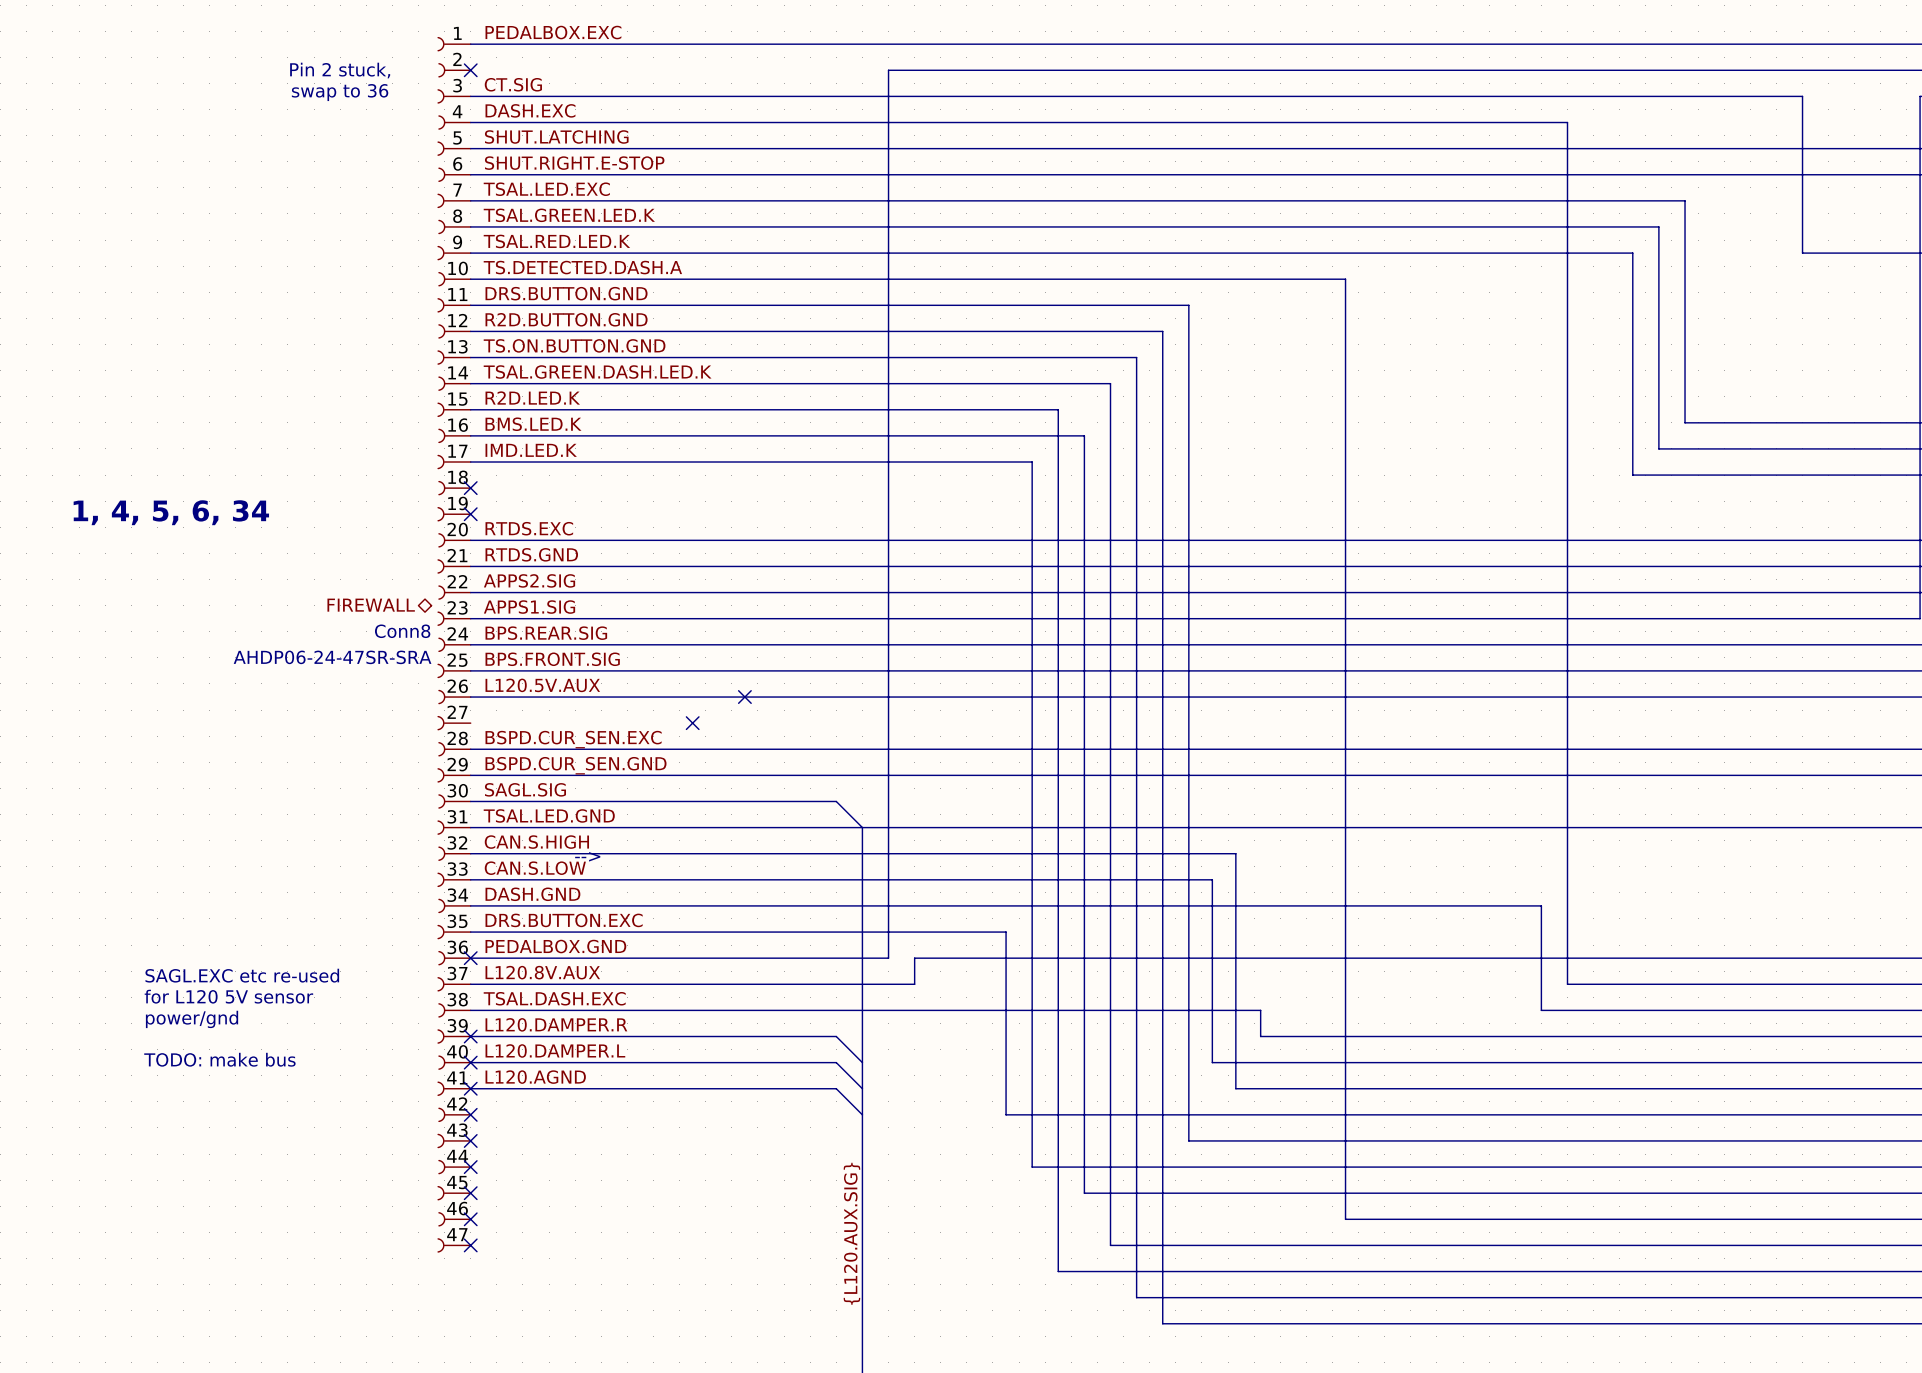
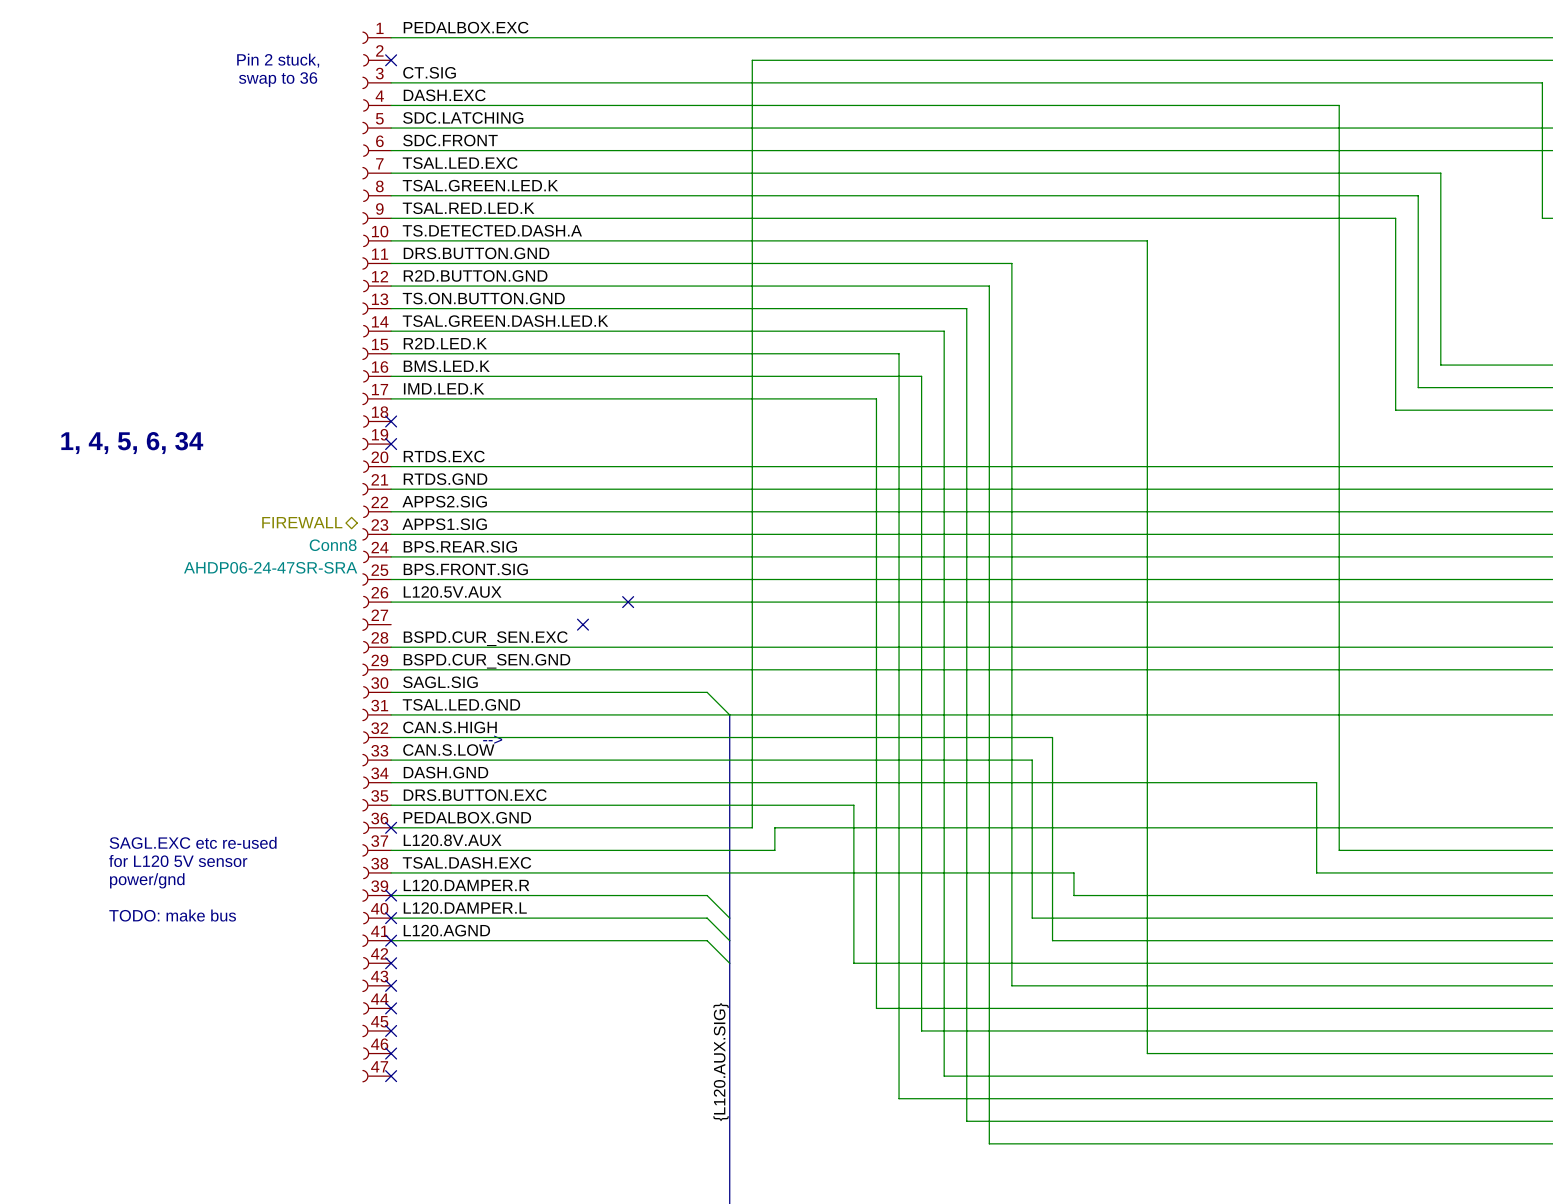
label: SHUT.LATCHING (556, 136) -> SDC.LATCHING (463, 117)
label: SHUT.RIGHT.E-STOP (574, 163) -> SDC.FRONT (450, 140)

